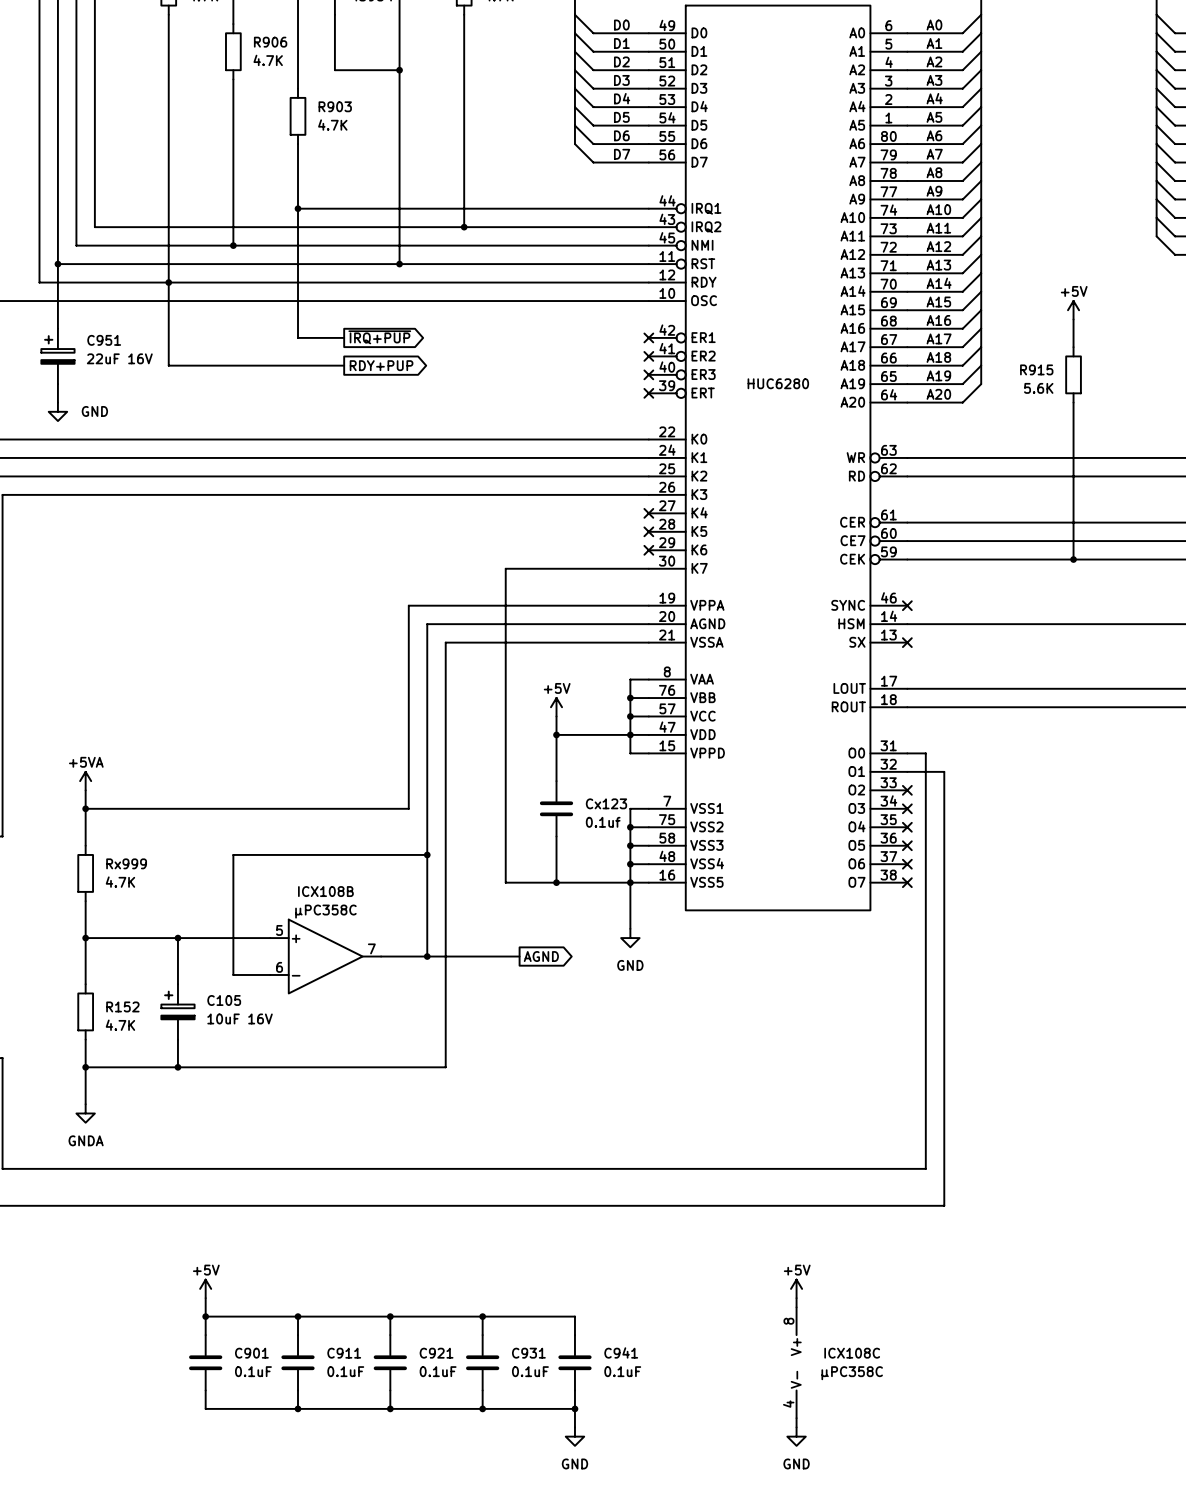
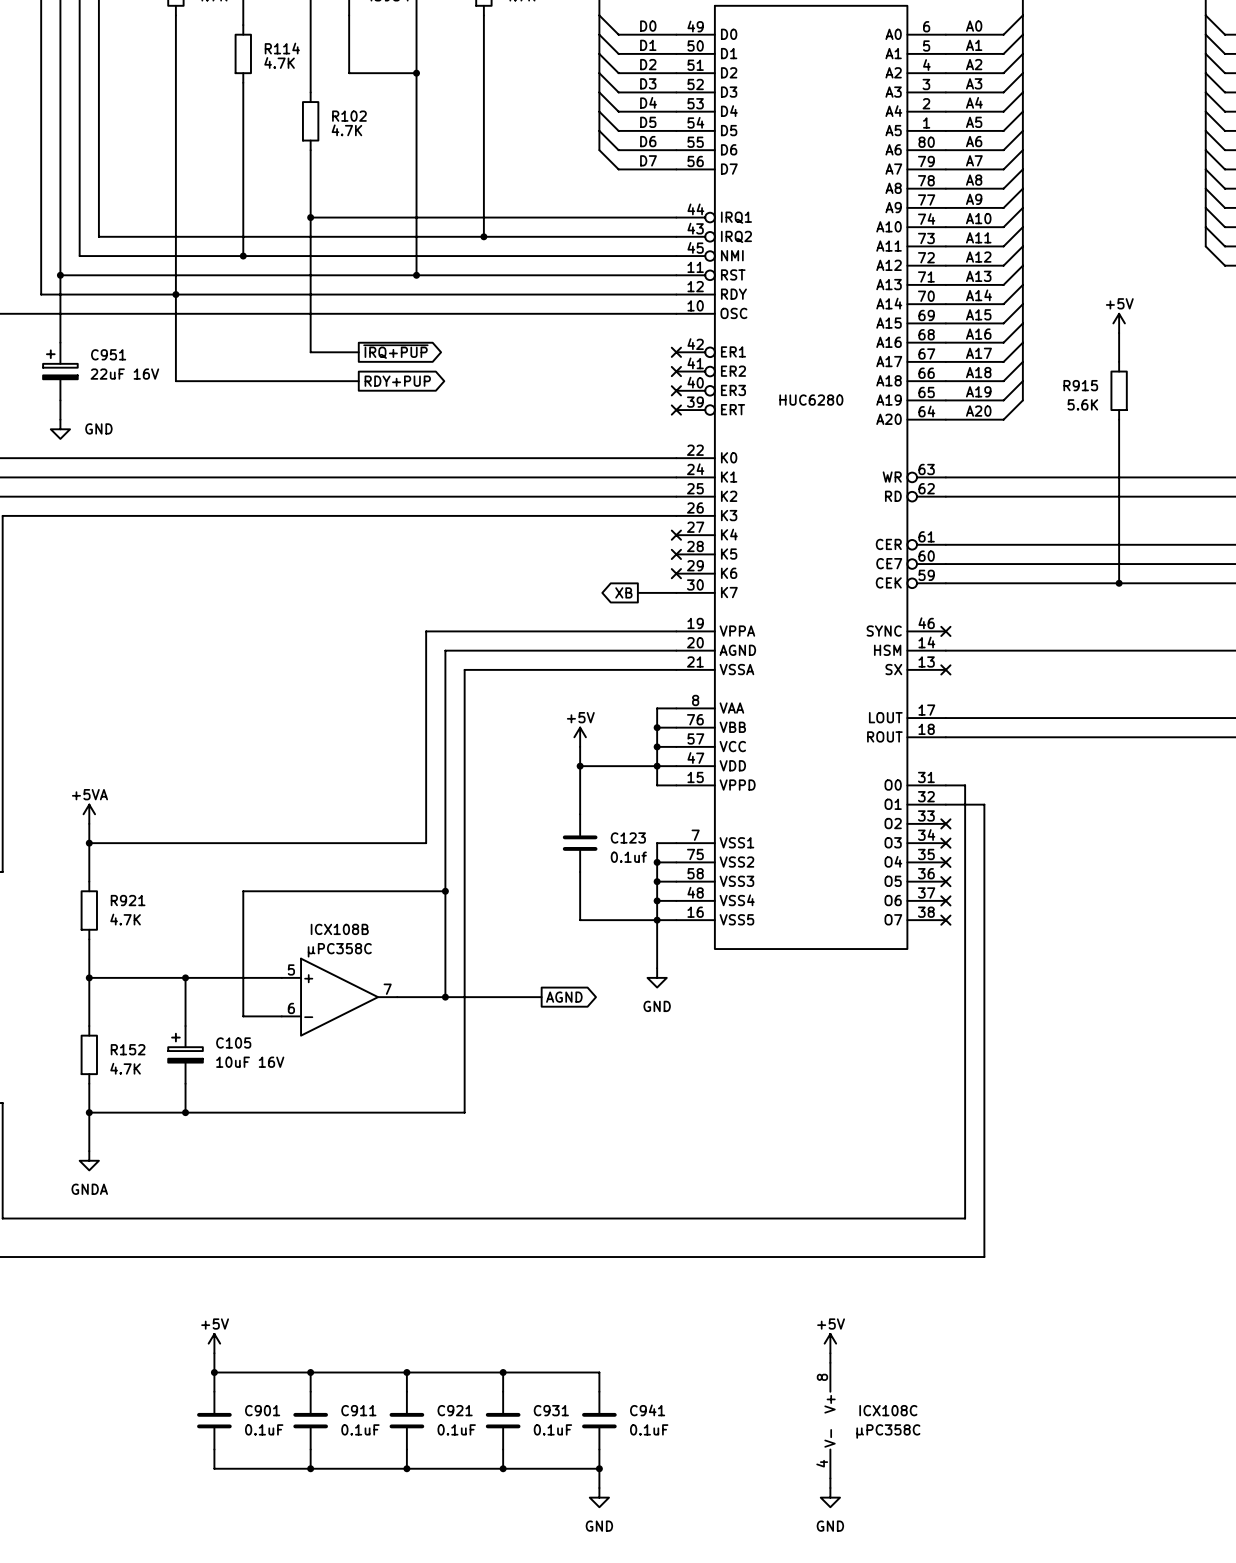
R906 name: R906 (270, 42) -> R114 (282, 48)
R903 name: R903 (335, 106) -> R102 (349, 116)
global label: none -> XB (623, 592)
wire: (611, 568) (505, 568) (505, 882) (556, 882) -> none
Cx123 name: Cx123 (606, 803) -> C123 (628, 837)
Rx999 name: Rx999 (126, 863) -> R921 (128, 900)
junction: (556, 882) -> none

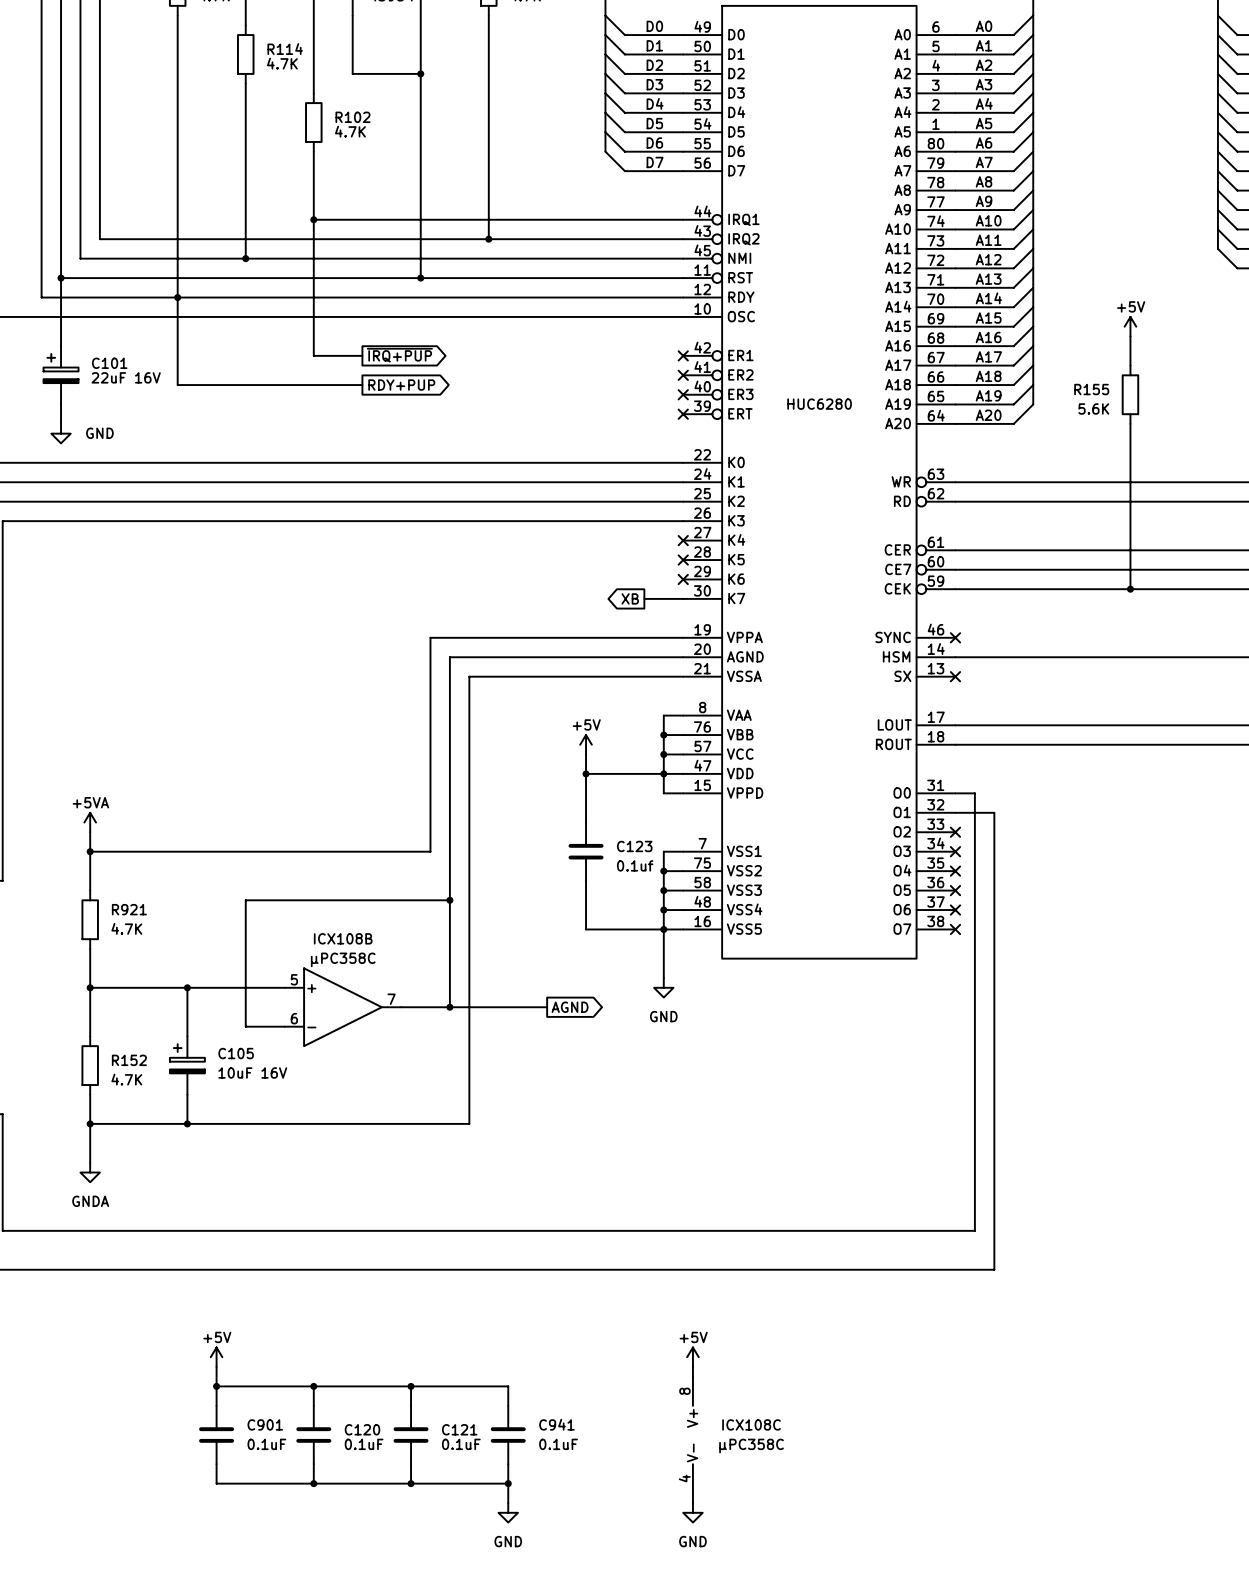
C951 name: C951 (108, 354) -> C101 (109, 363)
R915 name: R915 (1080, 385) -> R155 (1091, 389)
power symbol position: +5V (830, 1343) -> +5V (692, 1357)
wire: (830, 1353) (830, 1362) -> (692, 1366) (692, 1376)
wire: (503, 1372) (599, 1372) (599, 1391) -> none
junction: (503, 1372) -> none
C911 name: C911 (358, 1410) -> C120 (362, 1429)
C921 name: C921 (455, 1410) -> C121 (459, 1429)
C931 name: C931 (551, 1410) -> C941 (556, 1424)
C941: 0.1uF (599, 1420) -> none
ICX108C position: (830, 1420) -> (692, 1435)
wire: (599, 1449) (599, 1488) -> none
wire: (503, 1468) (599, 1468) -> (508, 1483) (508, 1503)
junction: (599, 1468) -> none
wire: (830, 1478) (830, 1488) -> (692, 1493) (692, 1503)
power symbol: none -> GND (508, 1512)
power symbol: GND (599, 1497) -> none
power symbol: none -> GND (692, 1512)
power symbol: GND (830, 1497) -> none

